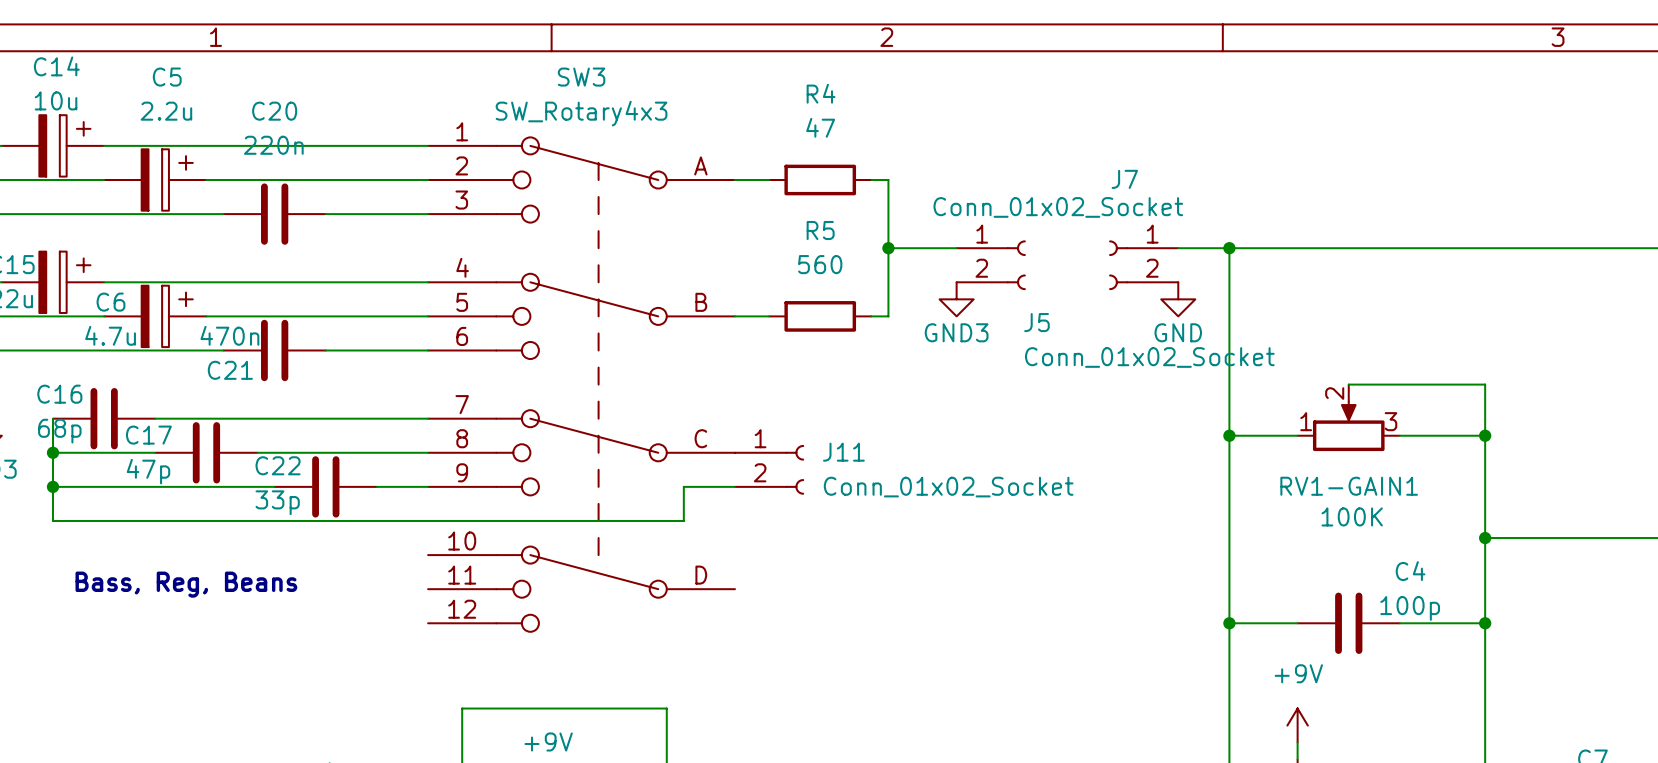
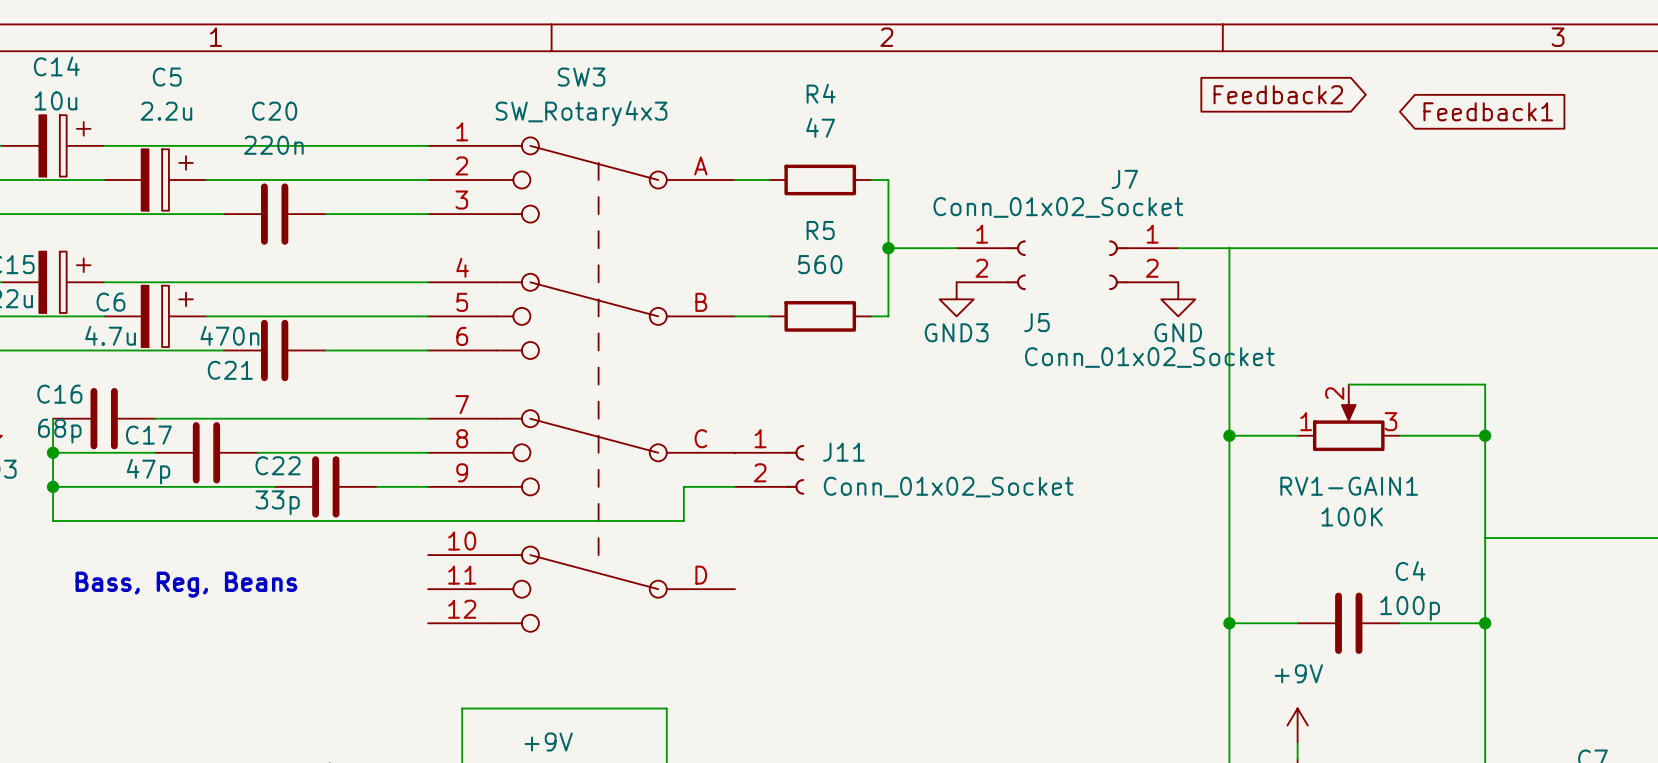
global label: none -> Feedback2 (1278, 94)
global label: none -> Feedback1 (1488, 111)
junction: (1229, 248) -> none
junction: (1485, 538) -> none

